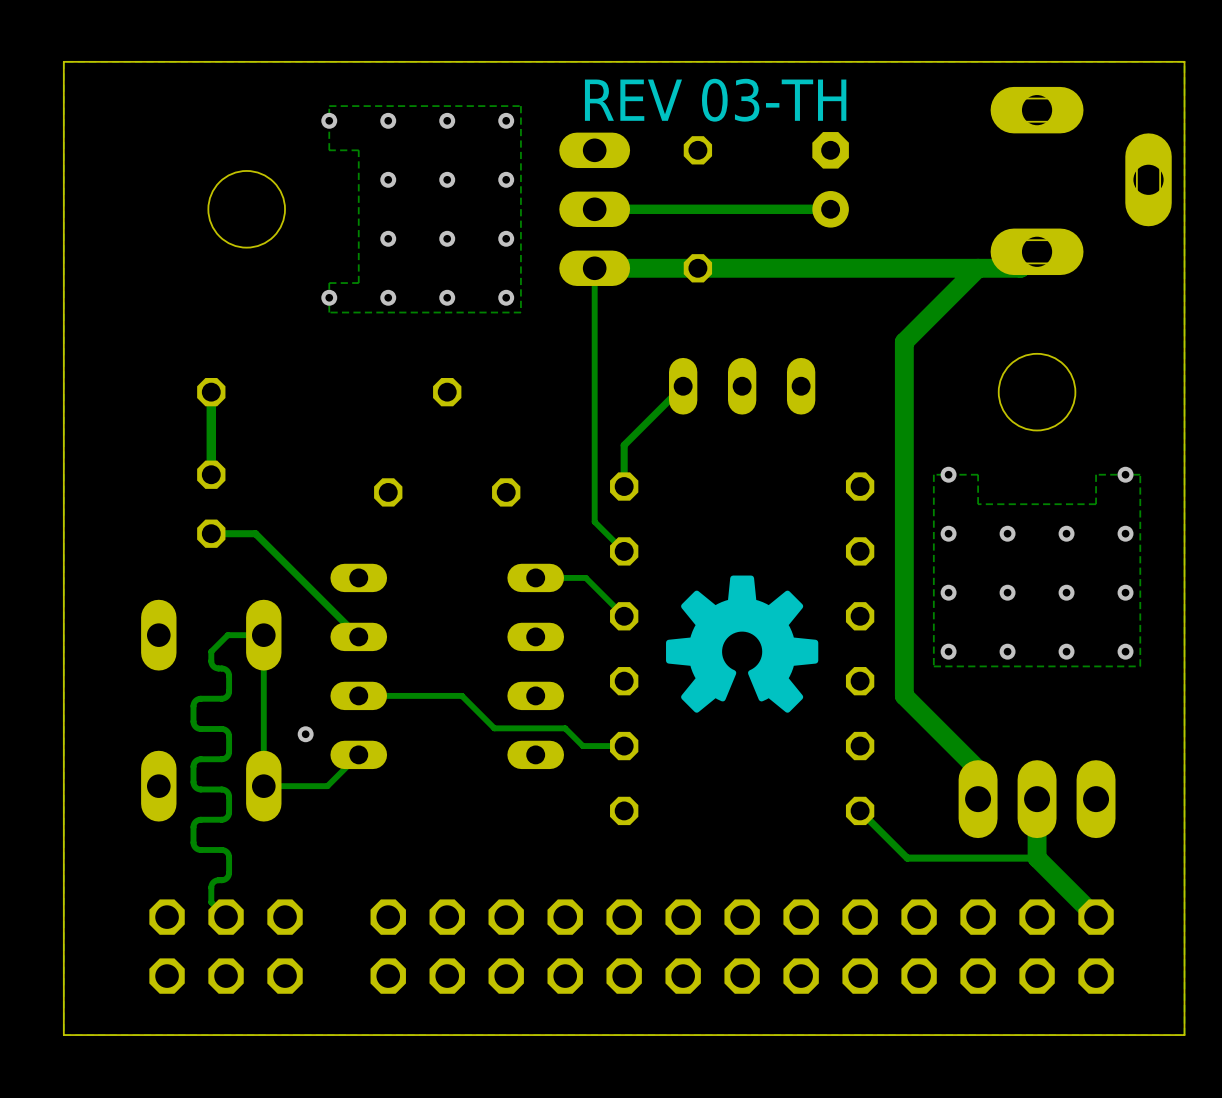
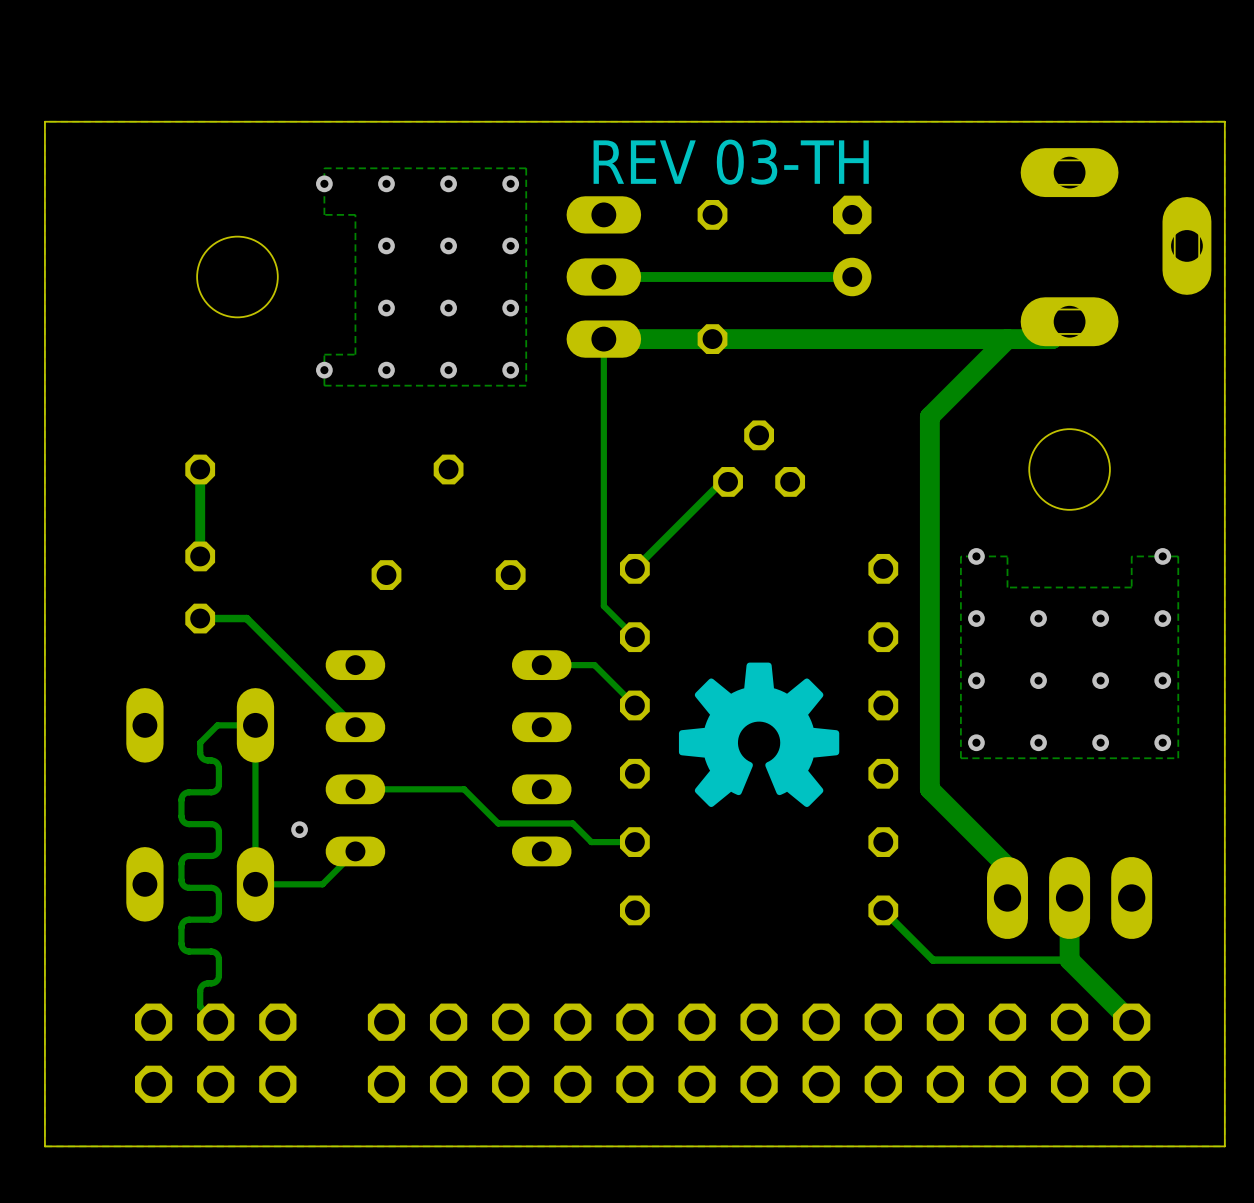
part footprint: [669, 357, 816, 415] -> [713, 420, 806, 497]
track: (683, 386) (624, 445) (624, 486) -> (728, 481) (721, 481) (634, 568)

